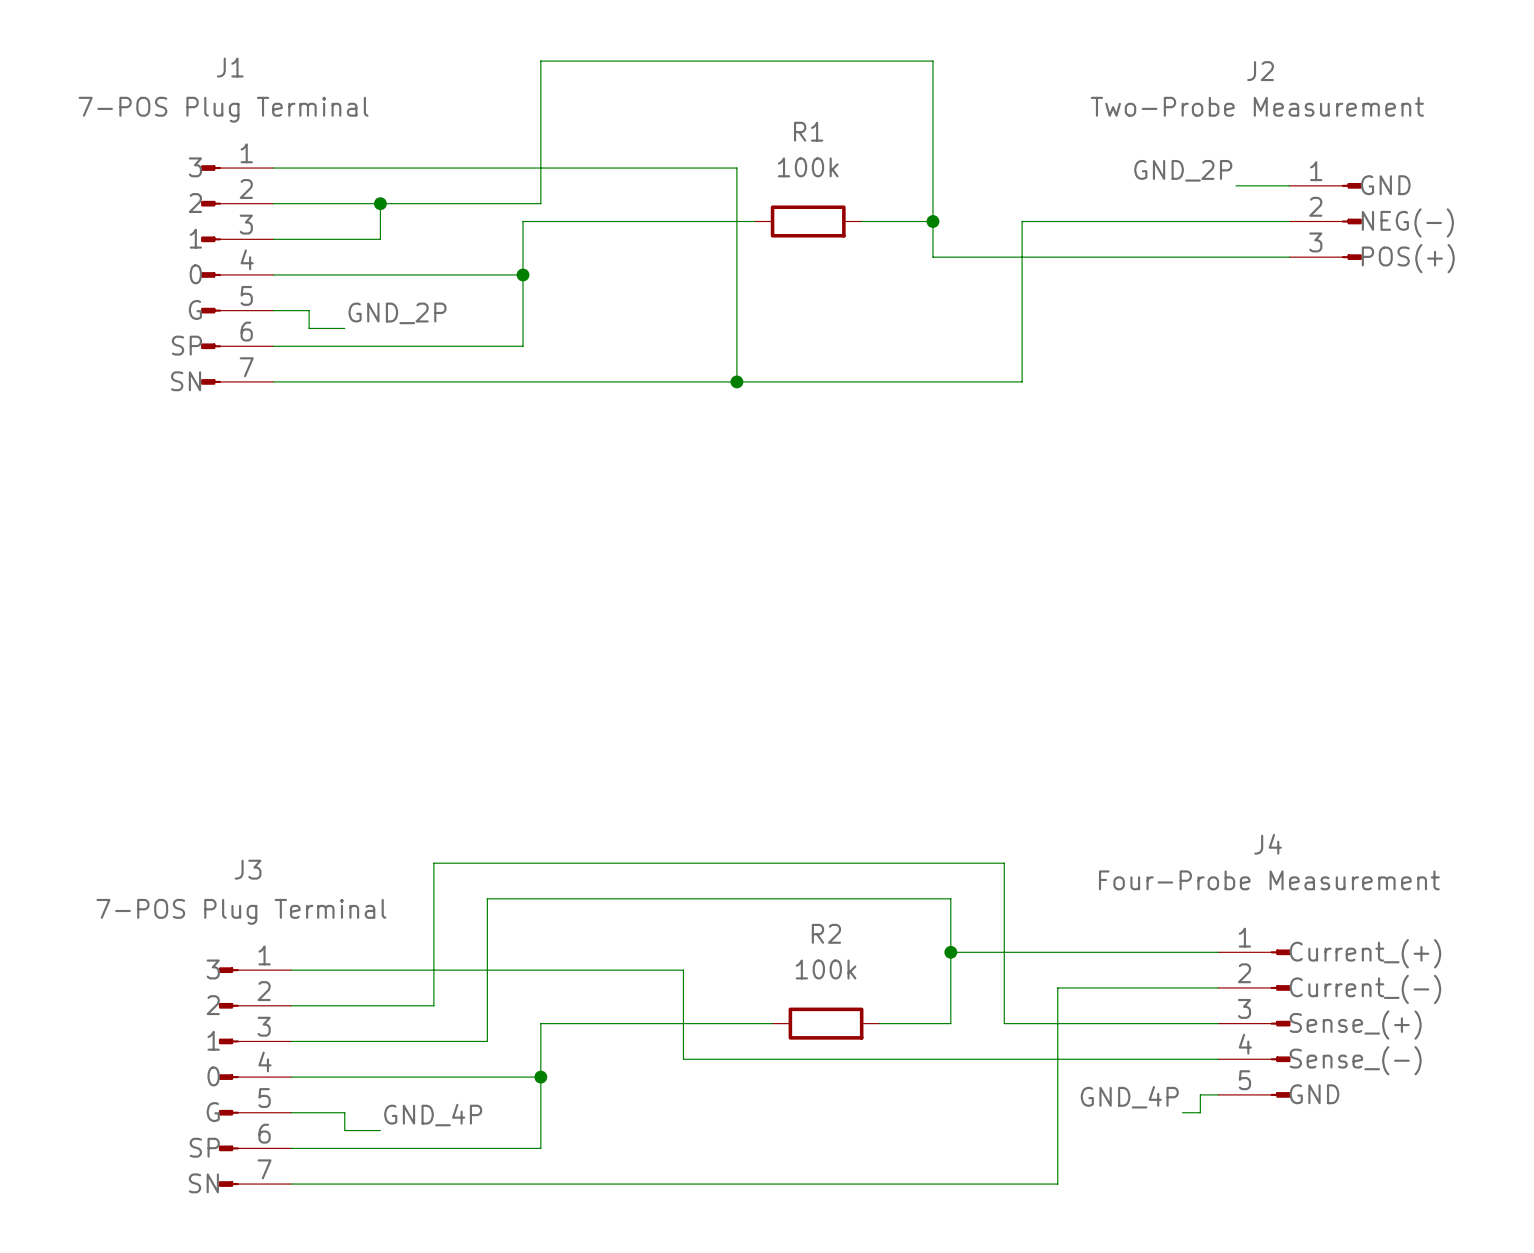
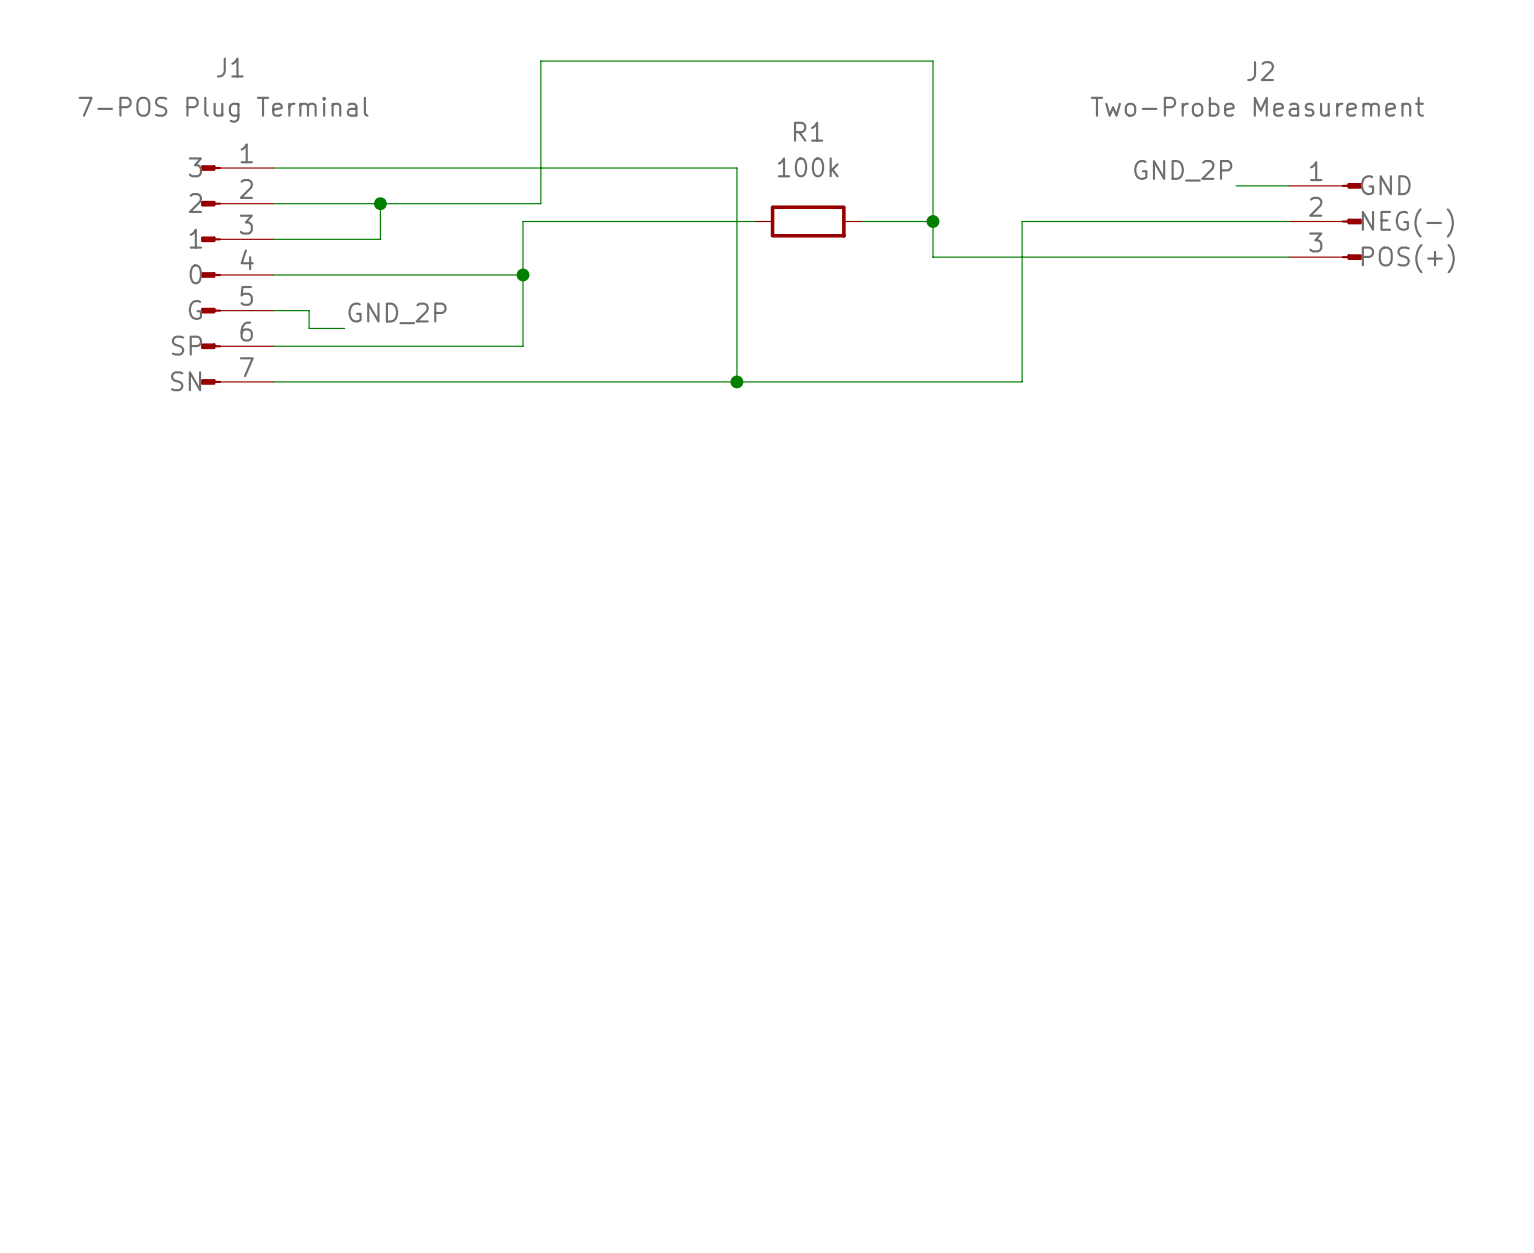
wire: (950, 952) (1218, 952) -> none
junction: (950, 952) -> none
wire: (291, 970) (683, 970) (683, 1059) (1218, 1059) -> none
wire: (1218, 987) (1057, 987) (1057, 1184) (291, 1184) -> none
wire: (291, 1005) (433, 1005) (433, 863) (1004, 863) (1004, 1023) (1218, 1023) -> none
wire: (772, 1023) (540, 1023) (540, 1148) (291, 1148) -> none
R2: 100k (826, 1023) -> none
wire: (879, 1023) (950, 1023) (950, 898) (487, 898) (487, 1041) (291, 1041) -> none
J4: Four-Probe Measurement (1254, 1023) -> none
J3: 7-POS Plug Terminal (255, 1077) -> none
wire: (291, 1077) (540, 1077) -> none
junction: (540, 1077) -> none
wire: (1218, 1094) (1200, 1094) (1200, 1112) (1182, 1112) -> none
label: GND_4P (1129, 1097) -> none
wire: (291, 1112) (344, 1112) (344, 1130) (380, 1130) -> none
label: GND_4P (433, 1115) -> none

